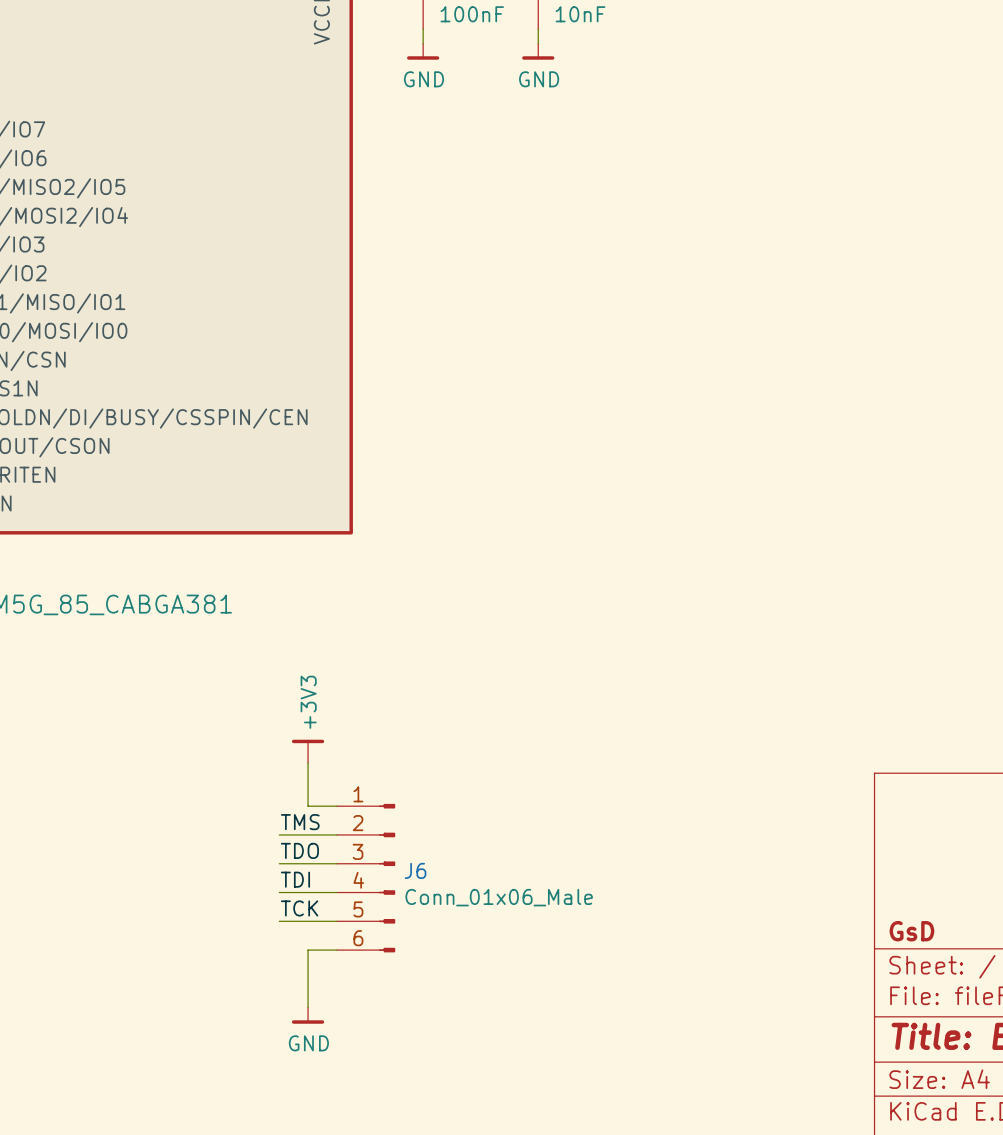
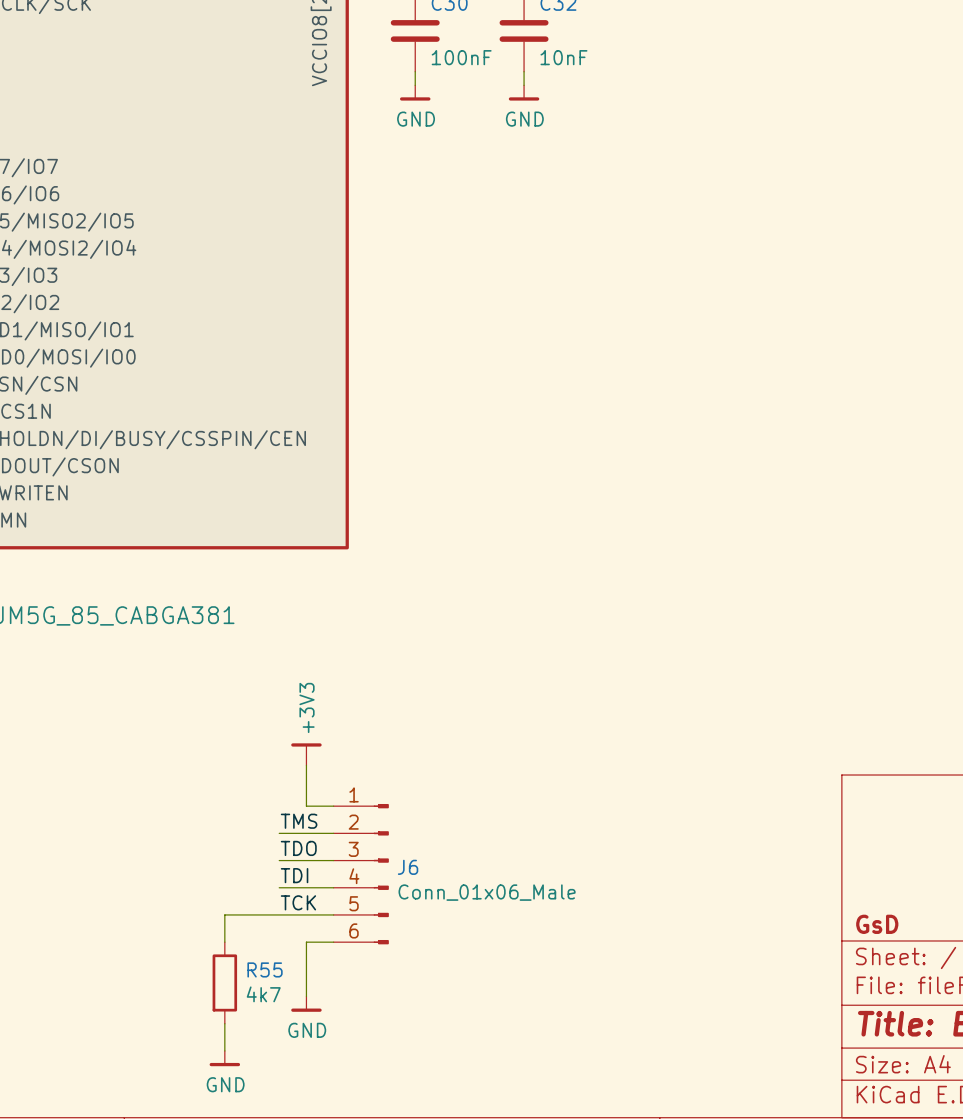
wire: none -> (279, 914) (224, 914) (224, 942)
R55: none -> 4k7 (224, 982)
wire: none -> (224, 1023) (224, 1050)
power symbol: none -> GND (224, 1058)

